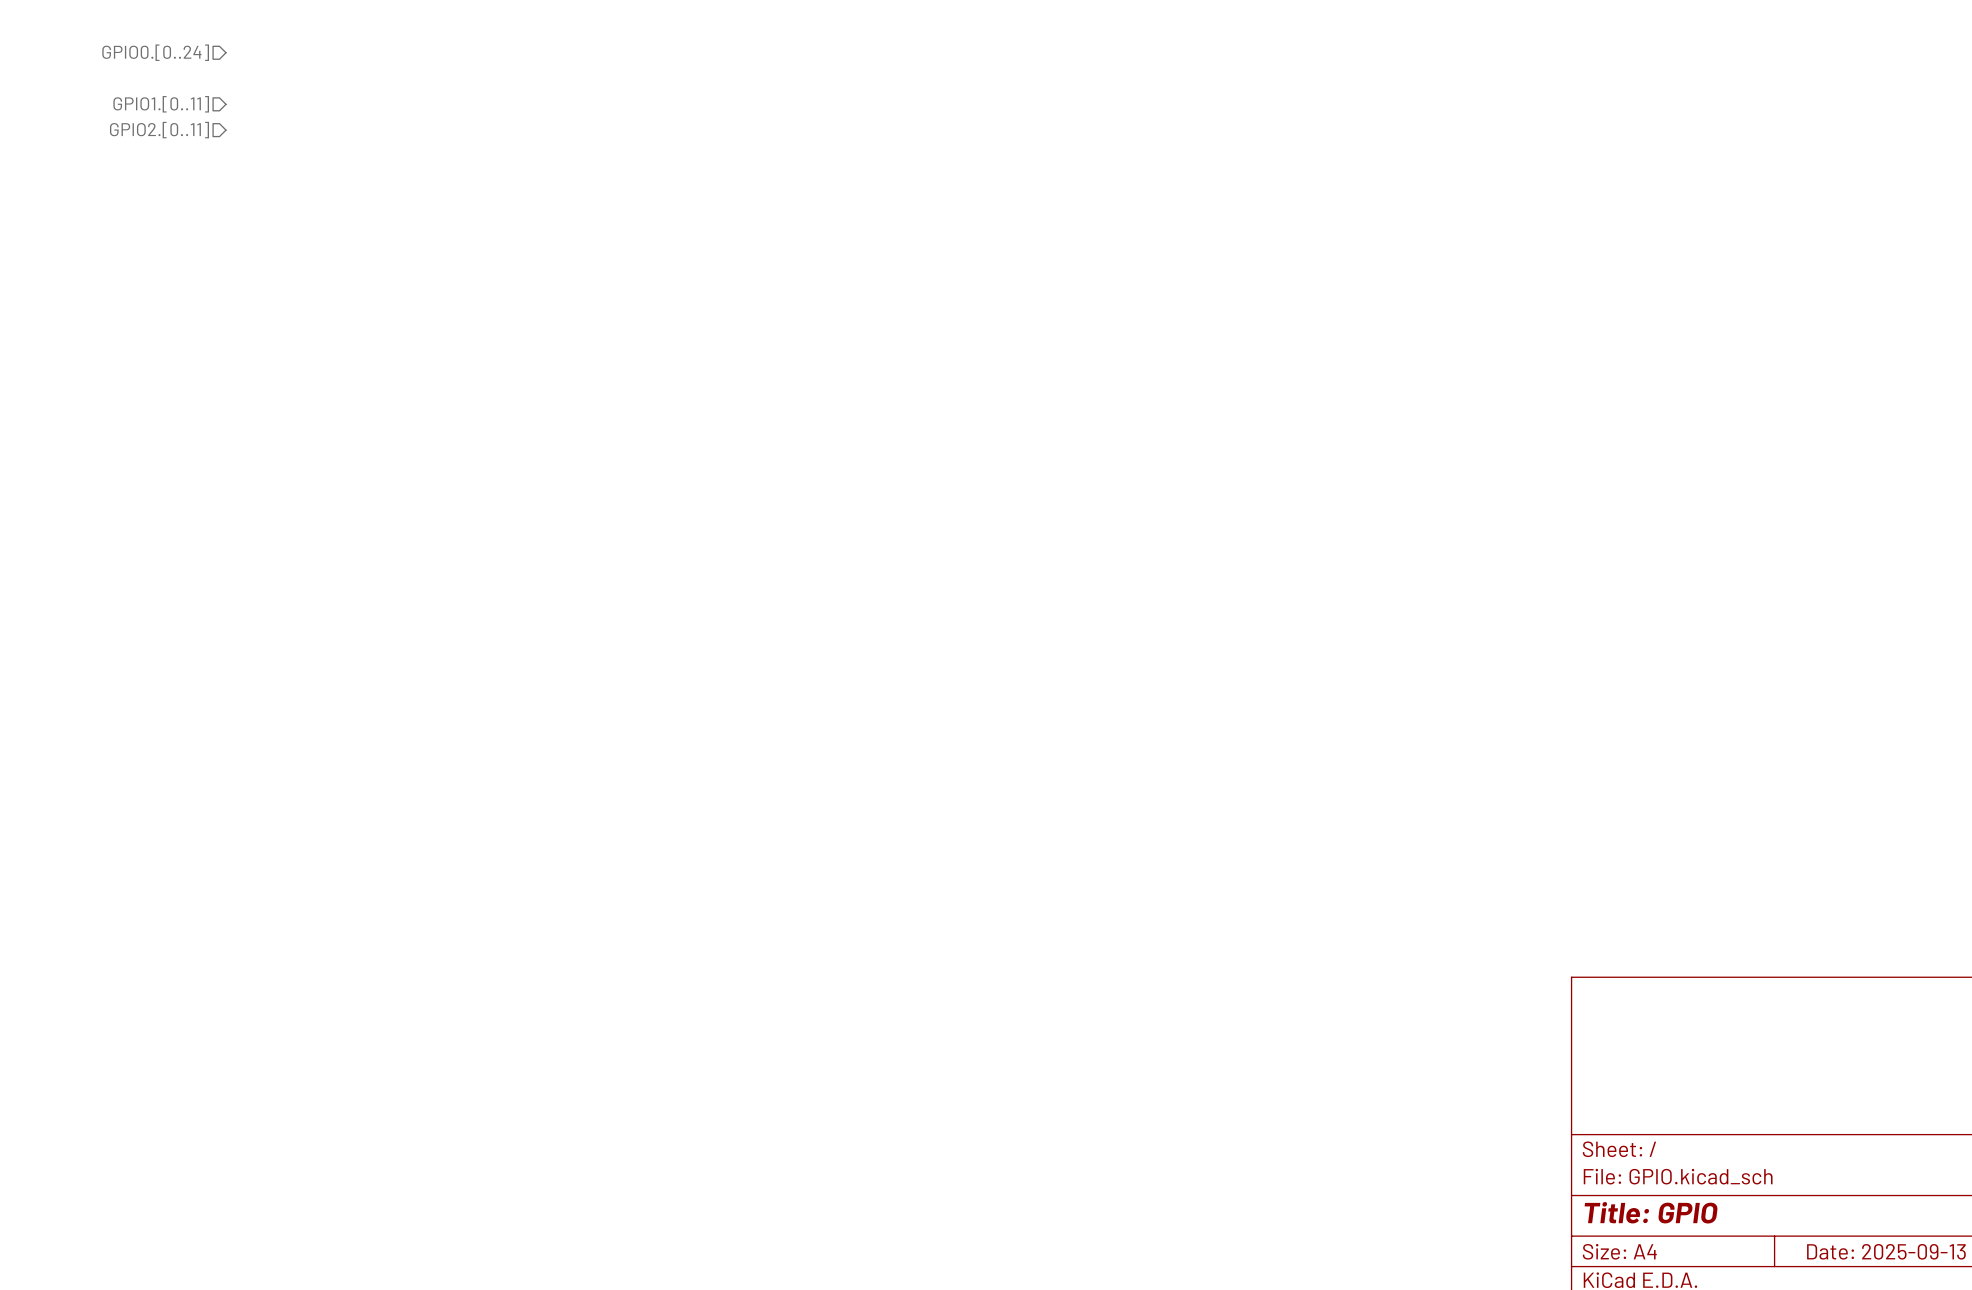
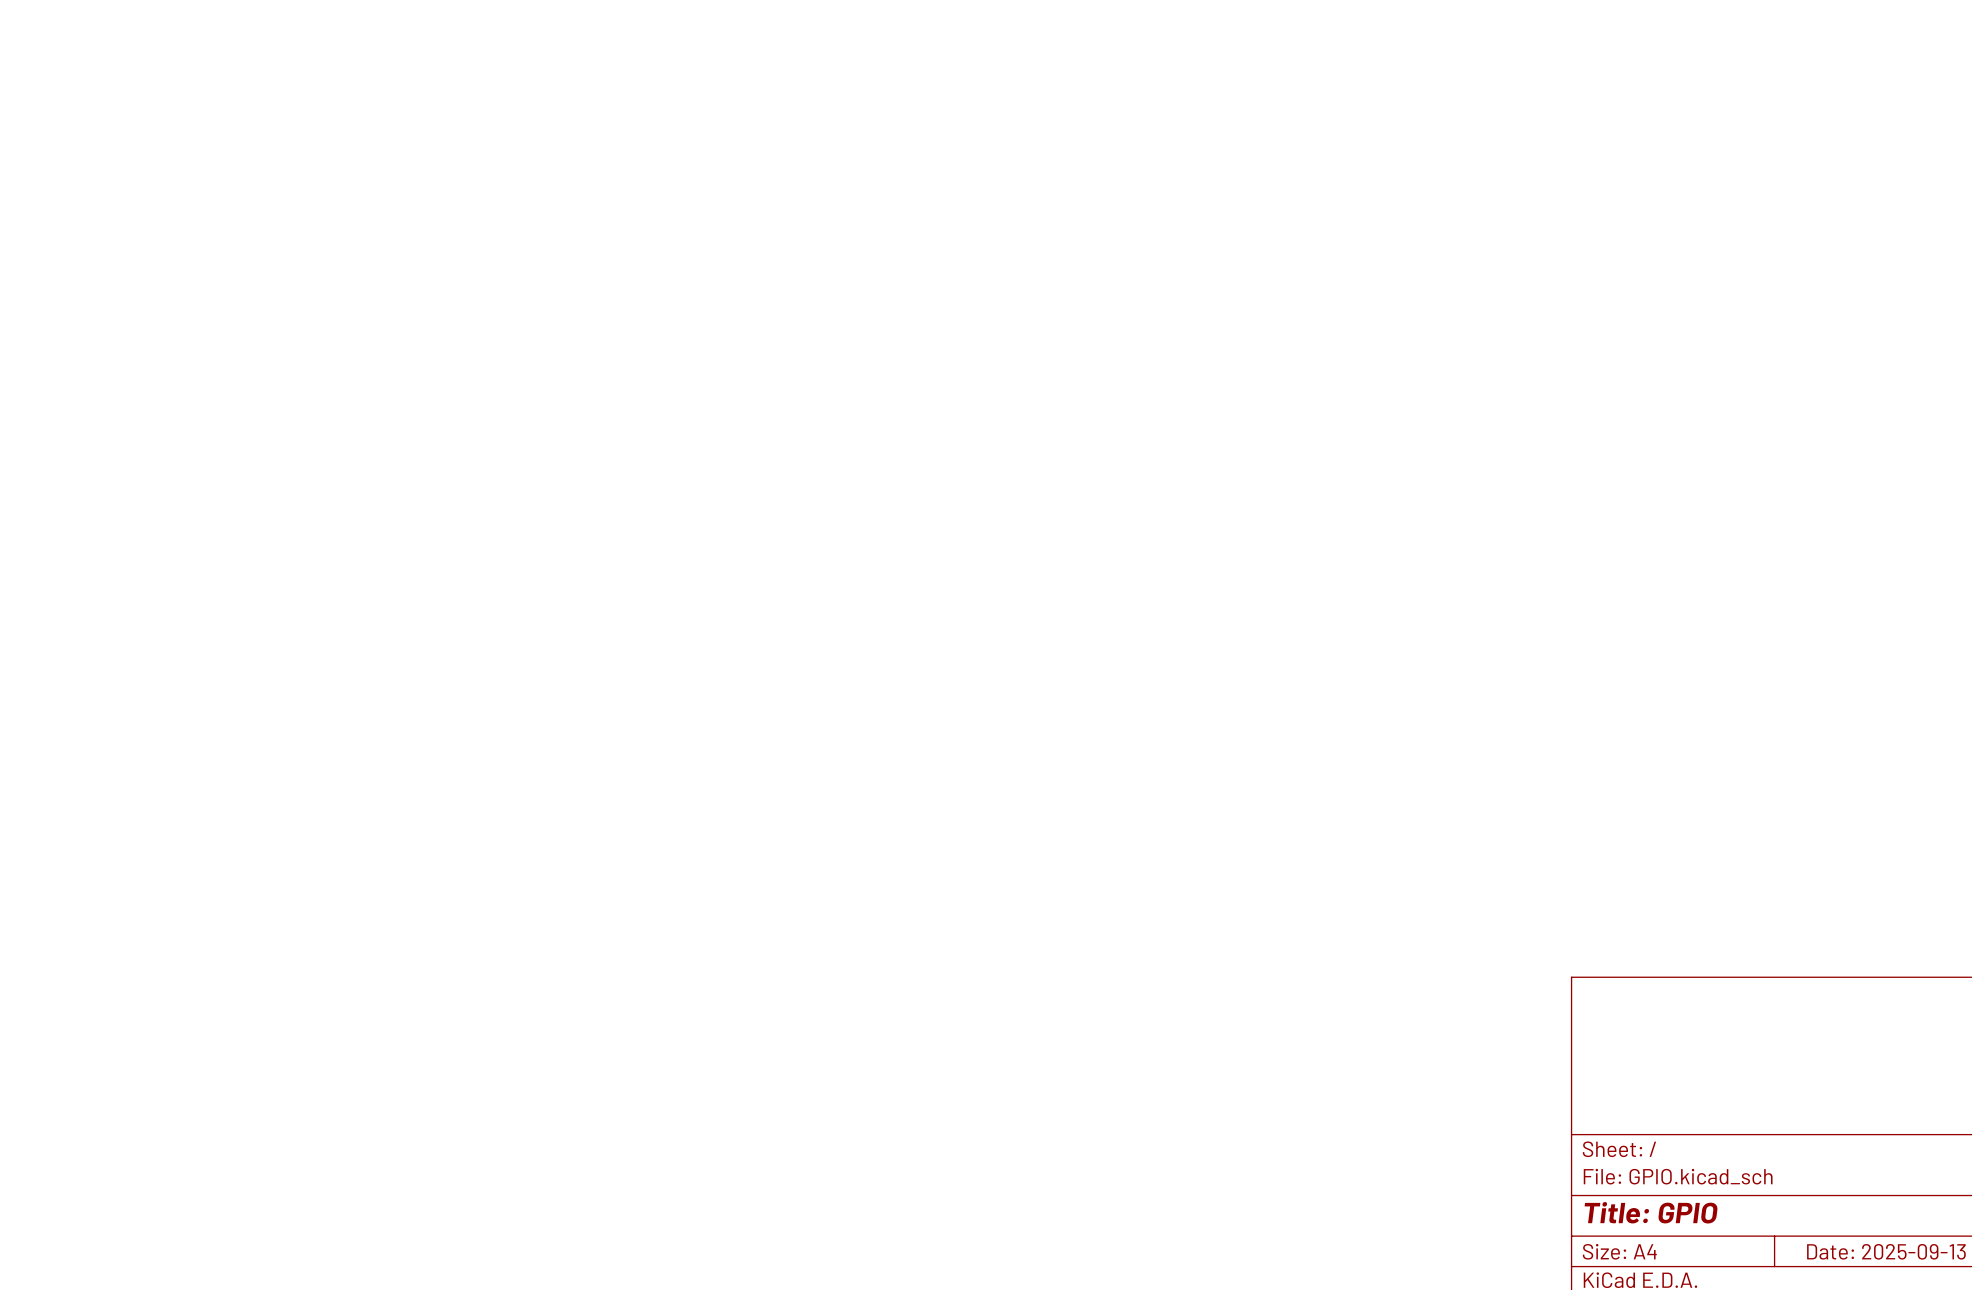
hierarchical label: GPIO0.[0..24] (155, 52) -> none
hierarchical label: GPIO1.[0..11] (161, 104) -> none
hierarchical label: GPIO2.[0..11] (159, 130) -> none

